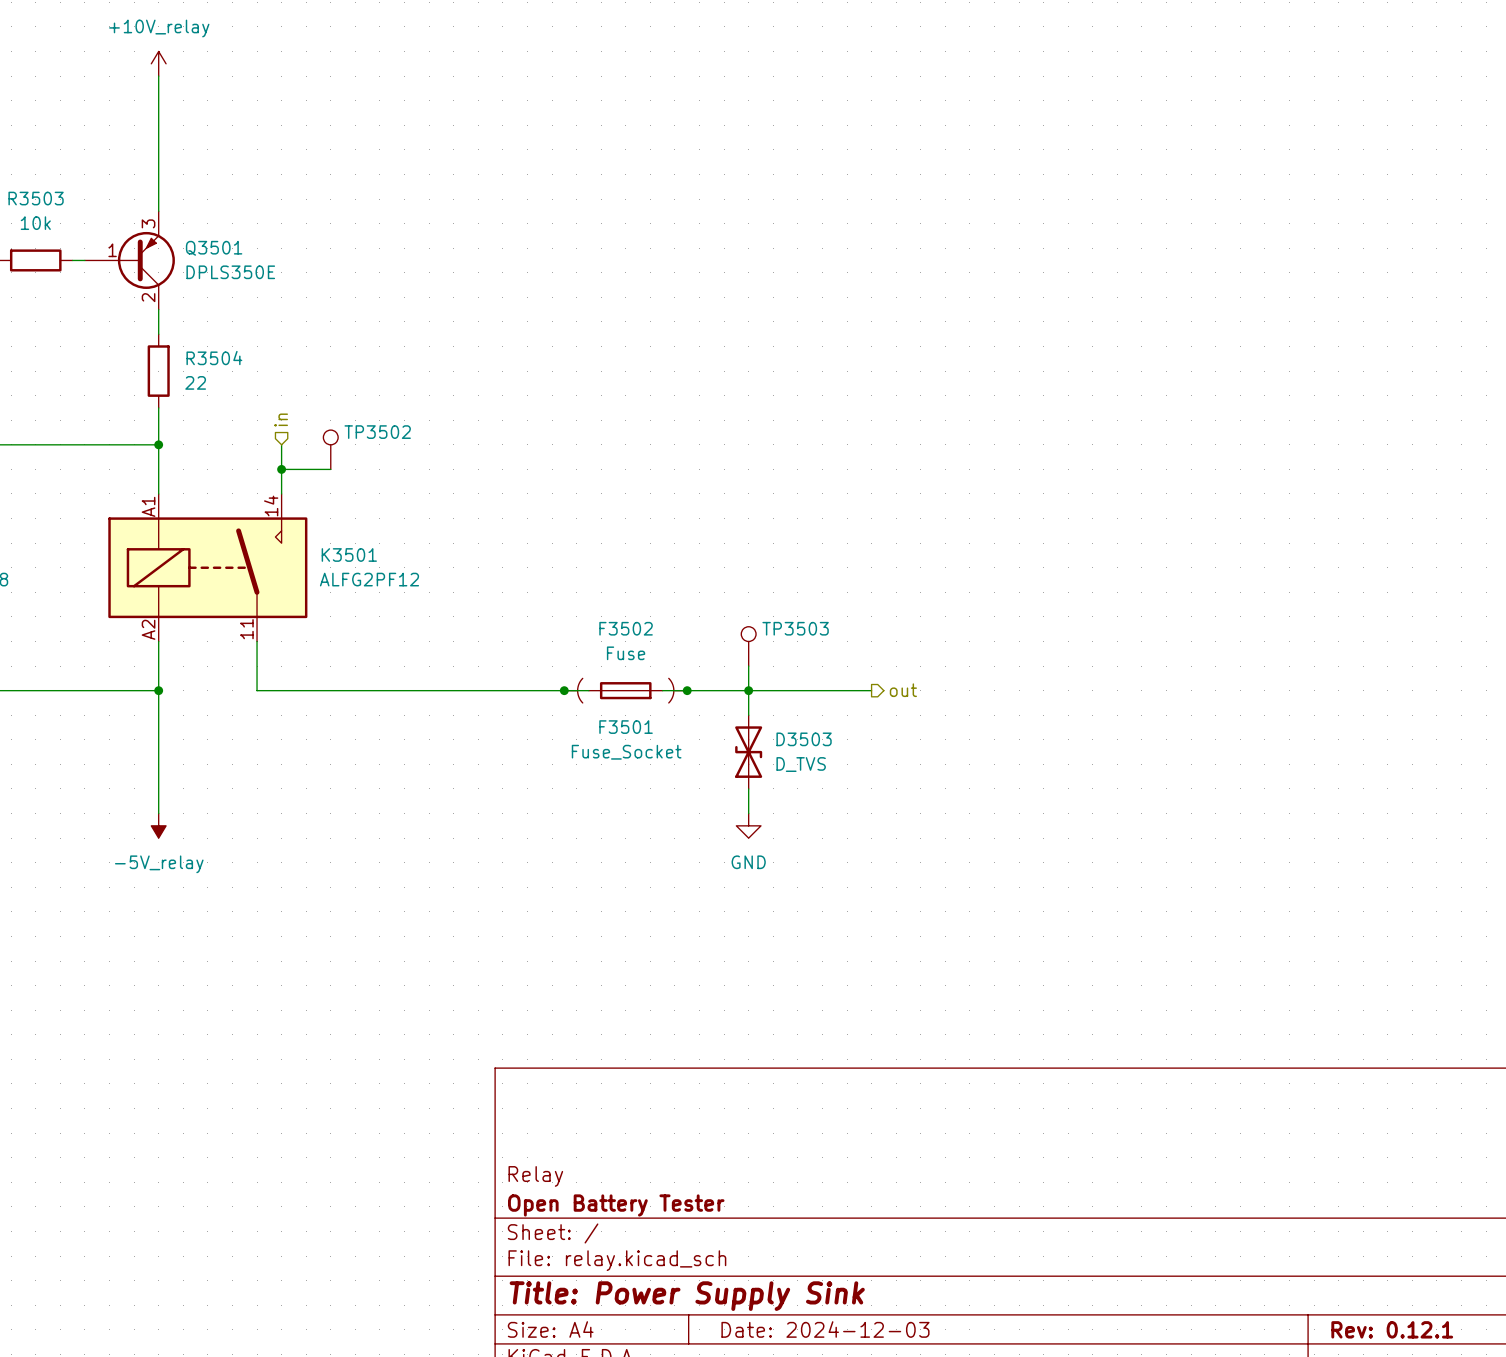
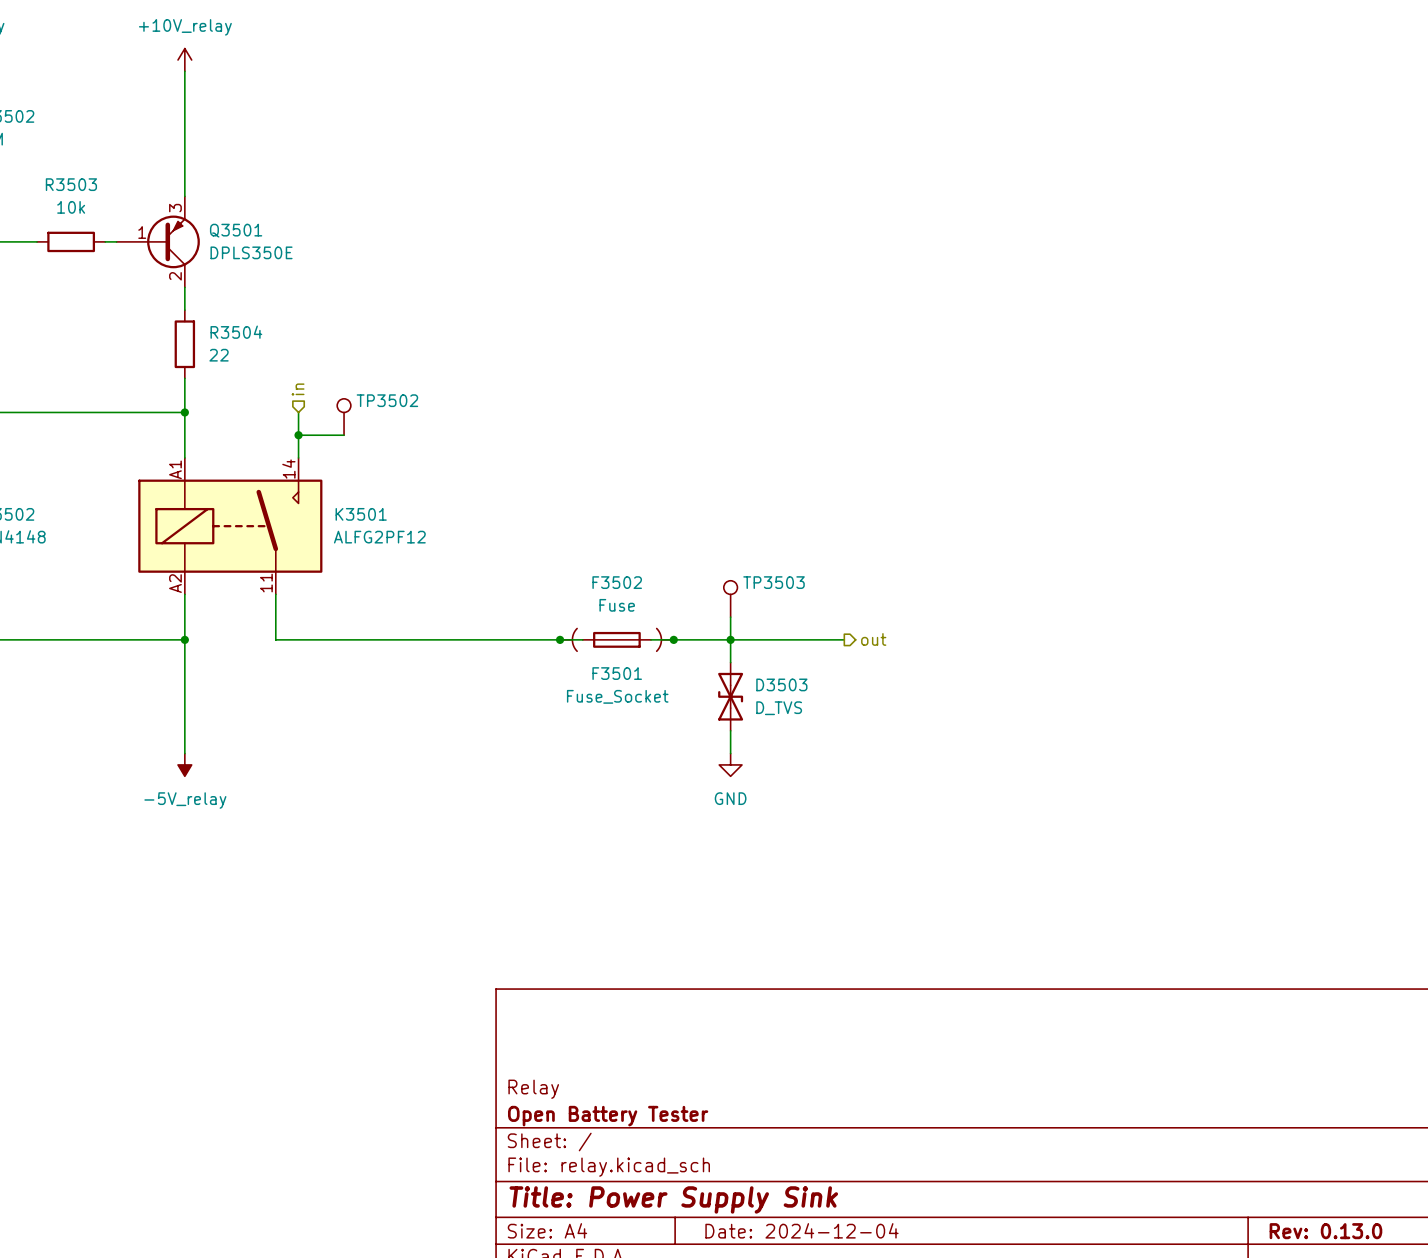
title block: Date: 2024-12-03 (825, 1329) -> Date: 2024-12-04 (801, 1230)
title block: Rev: 0.12.1 (1392, 1329) -> Rev: 0.13.0 (1325, 1231)

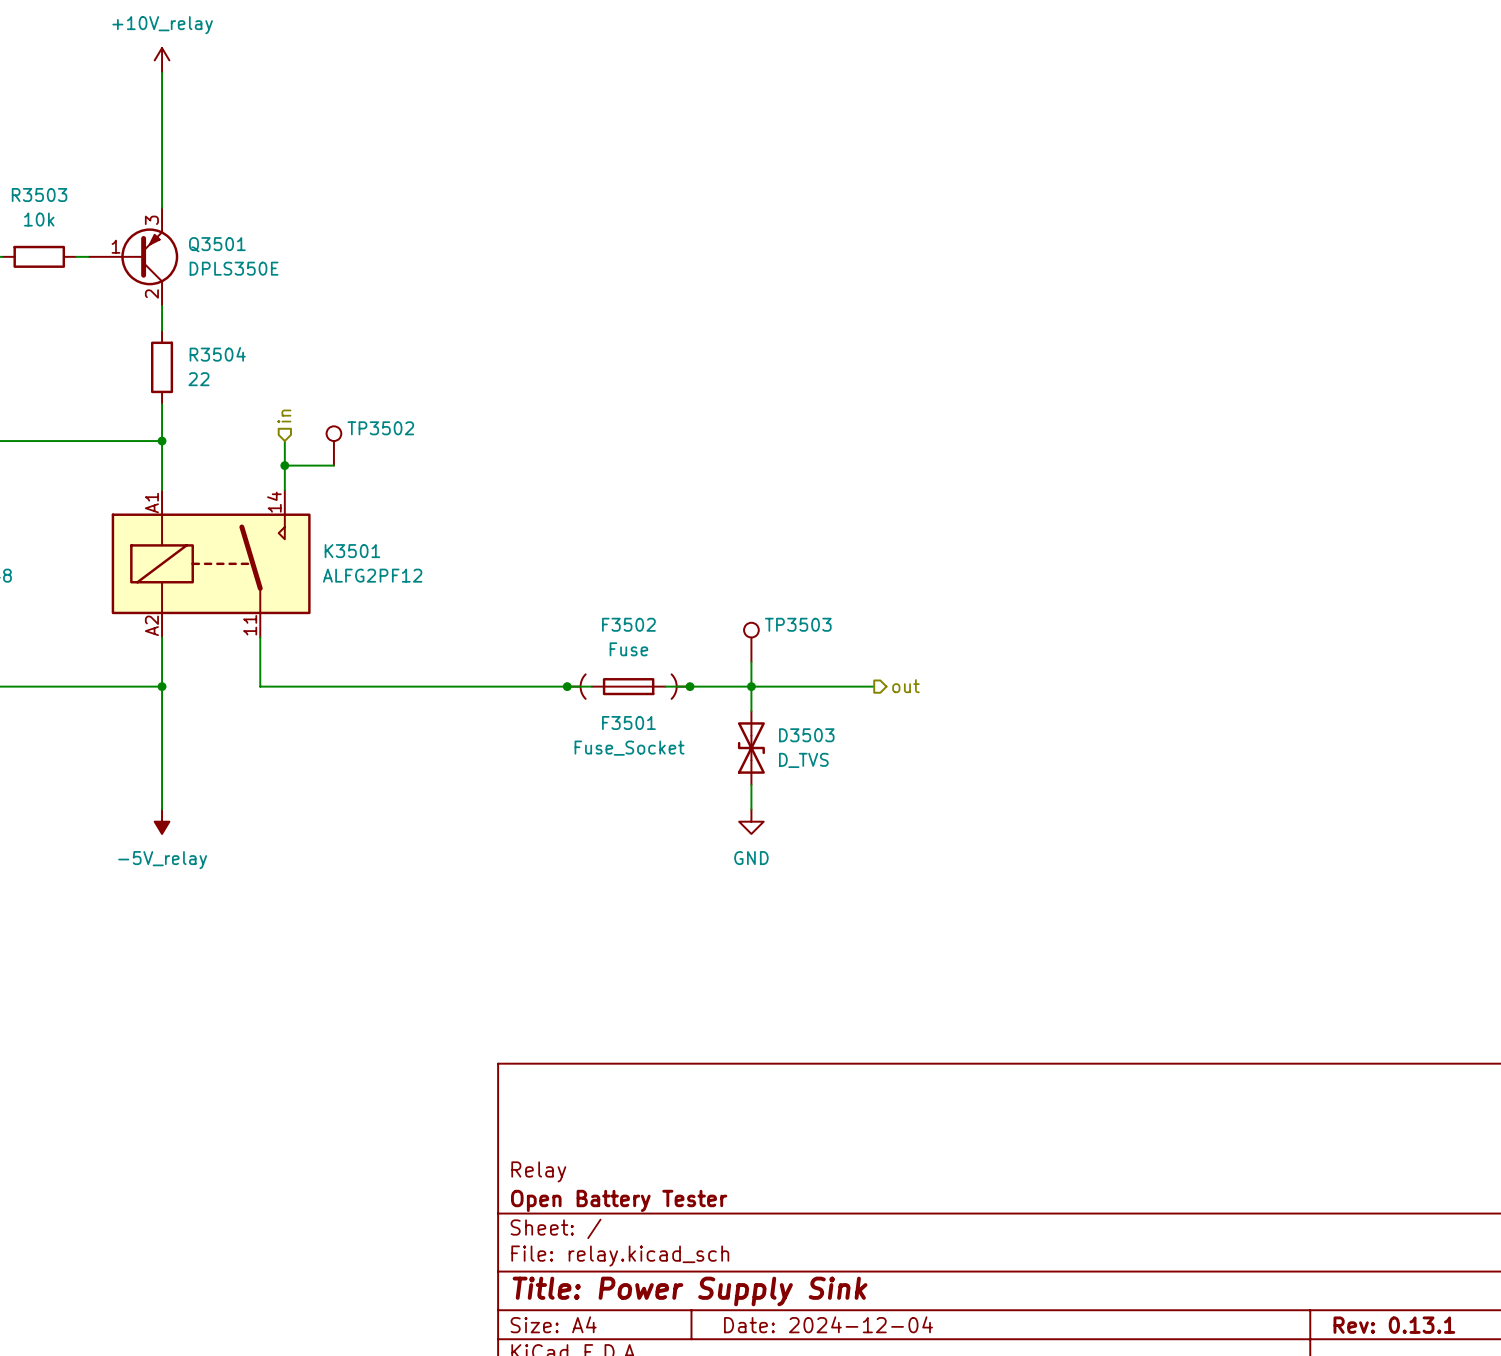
title block: Rev: 0.13.0 (1325, 1231) -> Rev: 0.13.1 (1394, 1325)

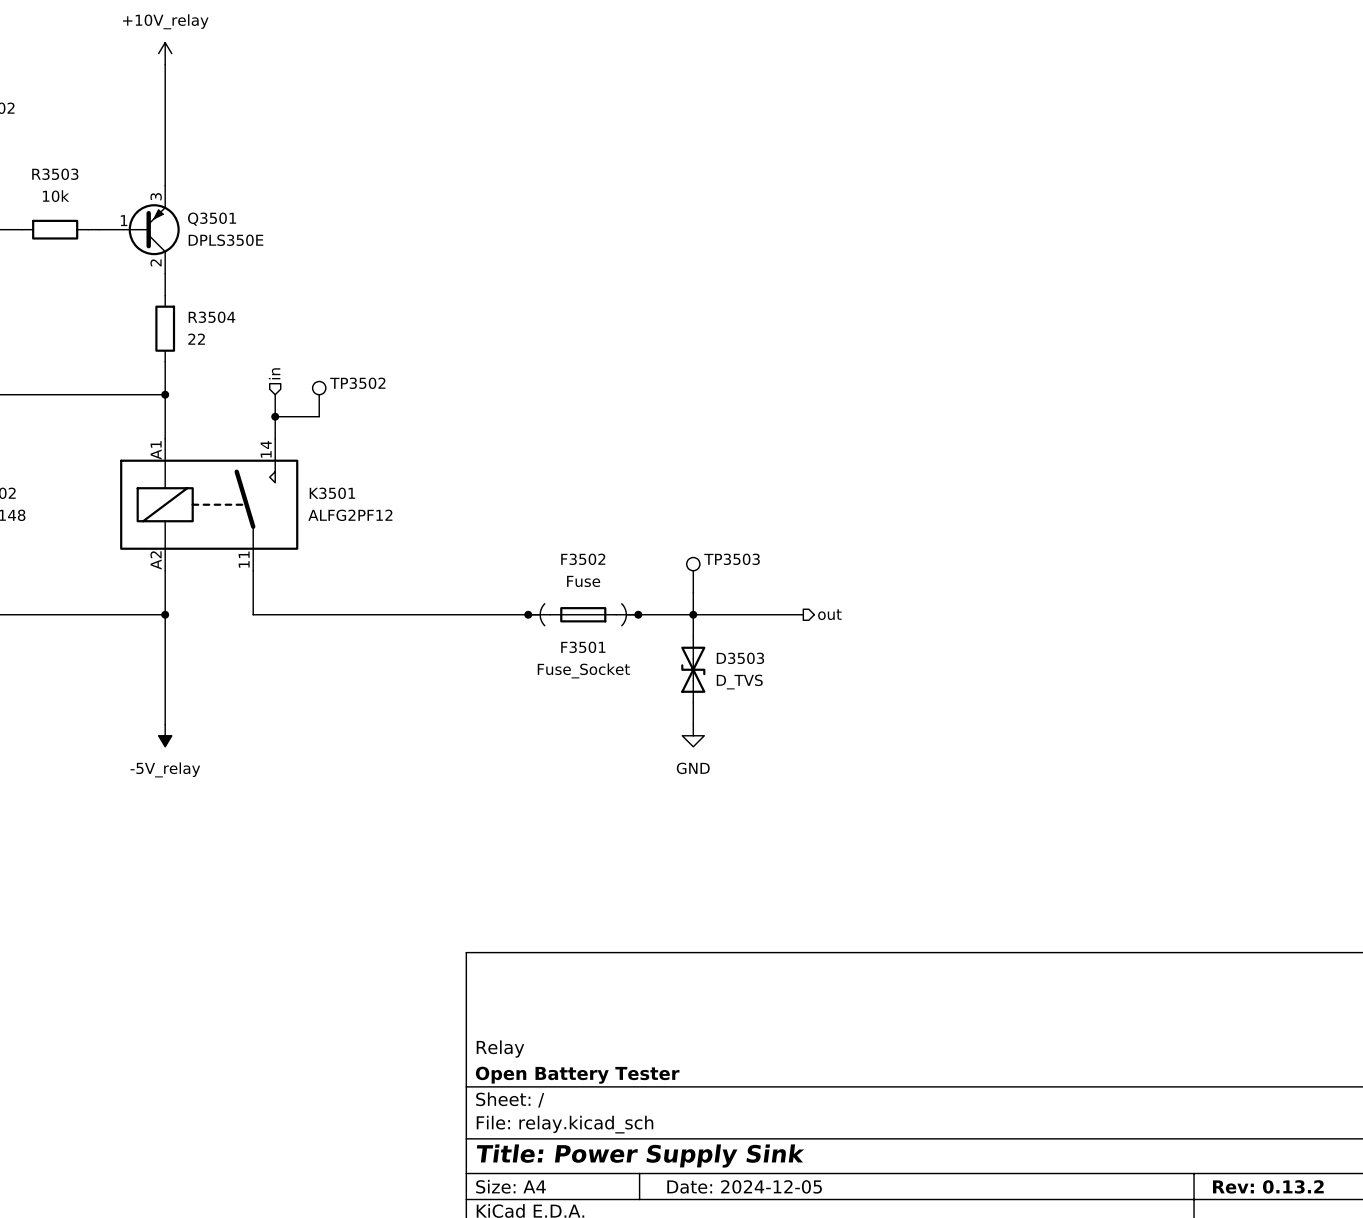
title block: Date: 2024-12-04 (828, 1324) -> Date: 2024-12-05 (744, 1186)
title block: Rev: 0.13.1 (1394, 1325) -> Rev: 0.13.2 (1268, 1186)

